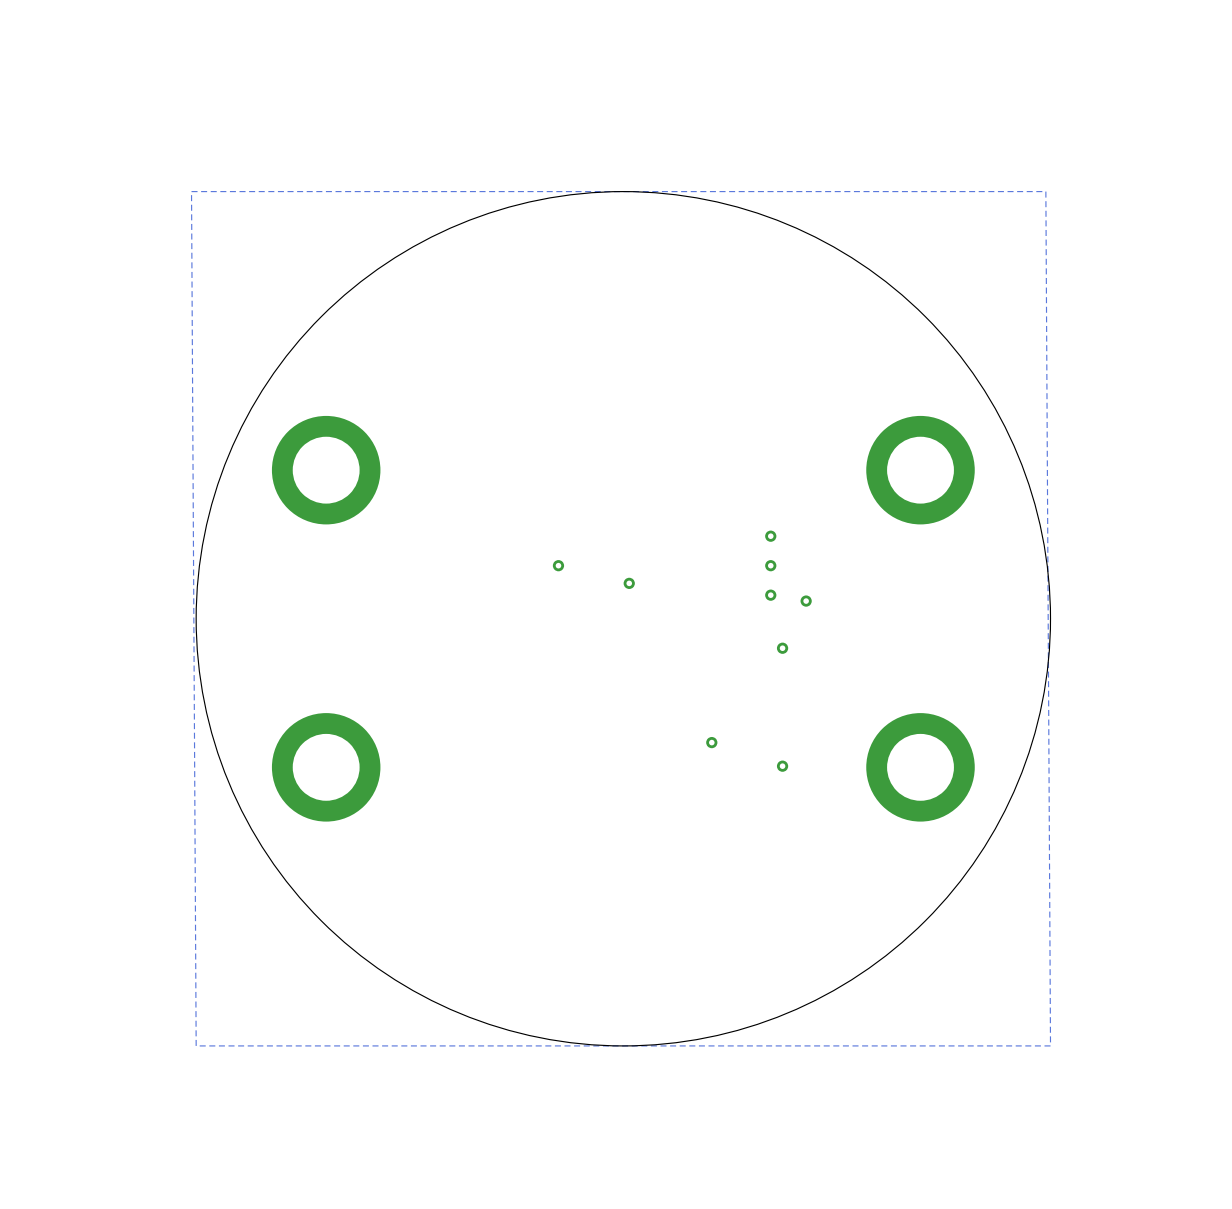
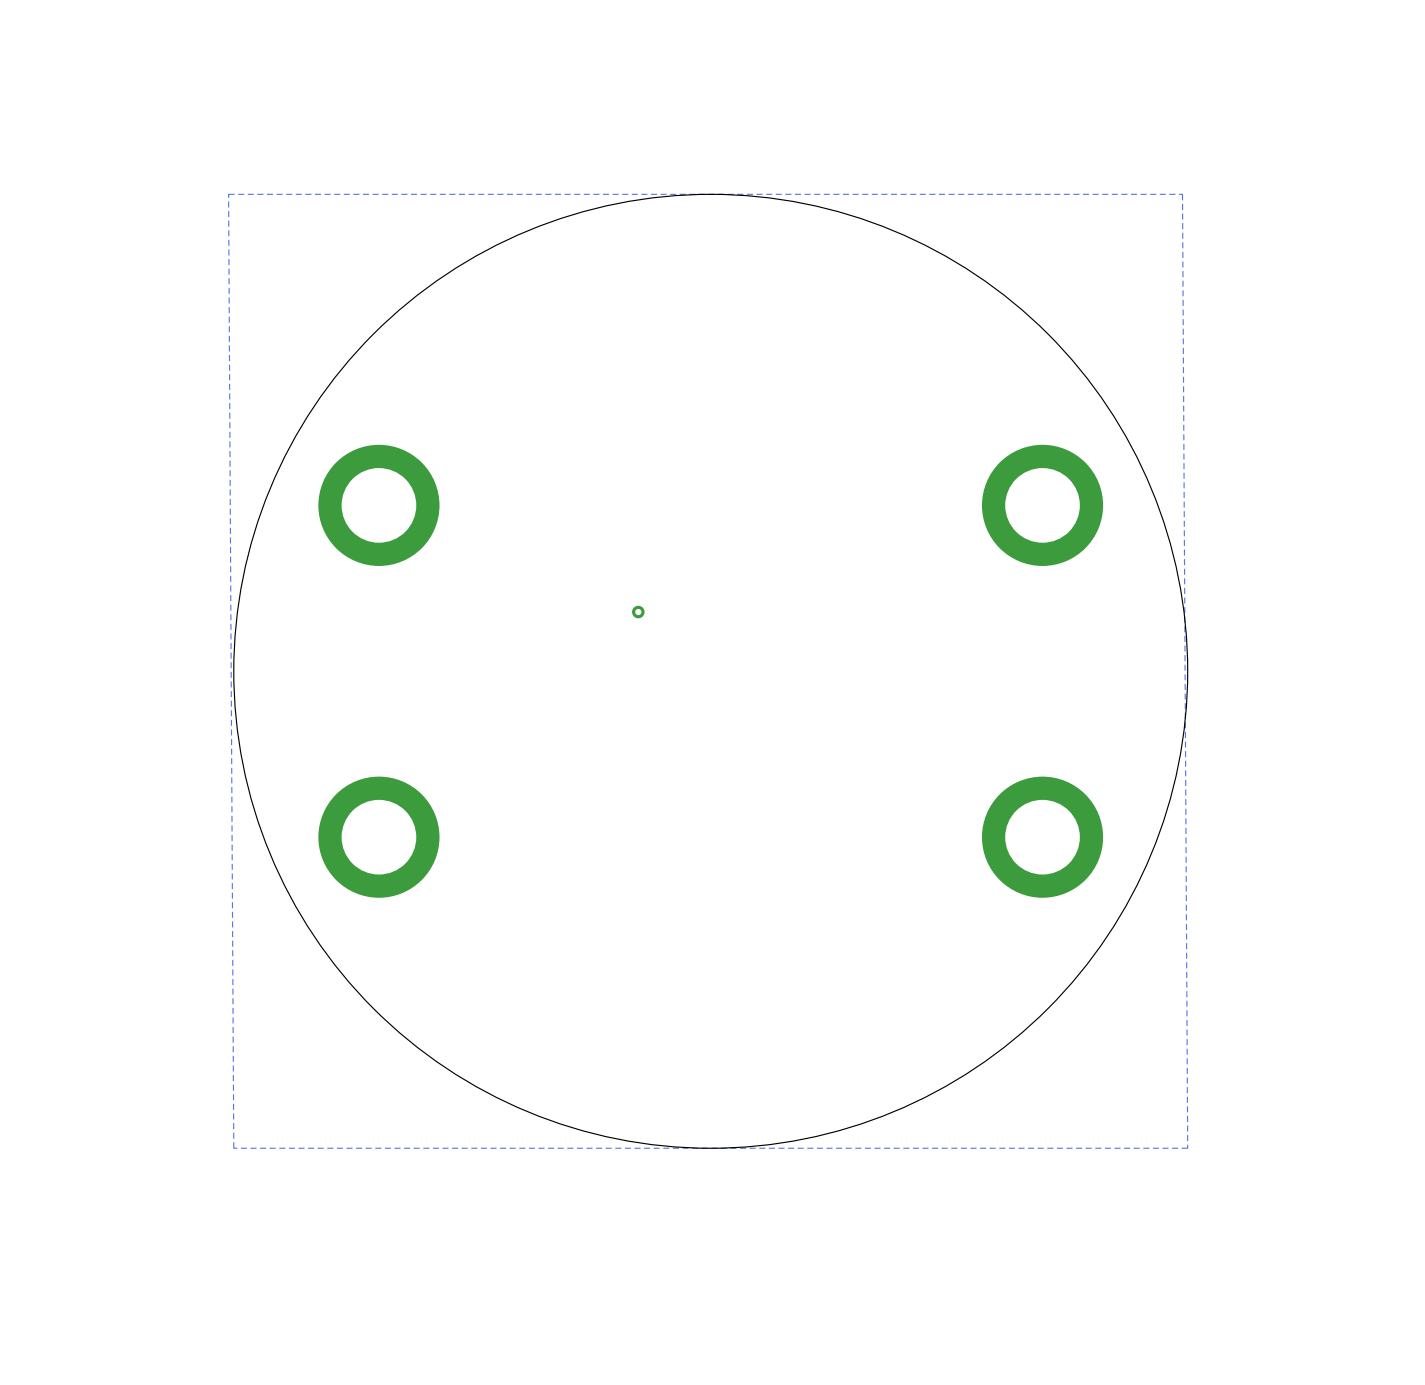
via: (770, 536) -> none
via: (770, 565) -> none
via: (629, 583) -> none
via: (770, 595) -> none
via: (806, 601) -> none
via: (782, 648) -> none
via: (711, 742) -> none
via: (782, 766) -> none

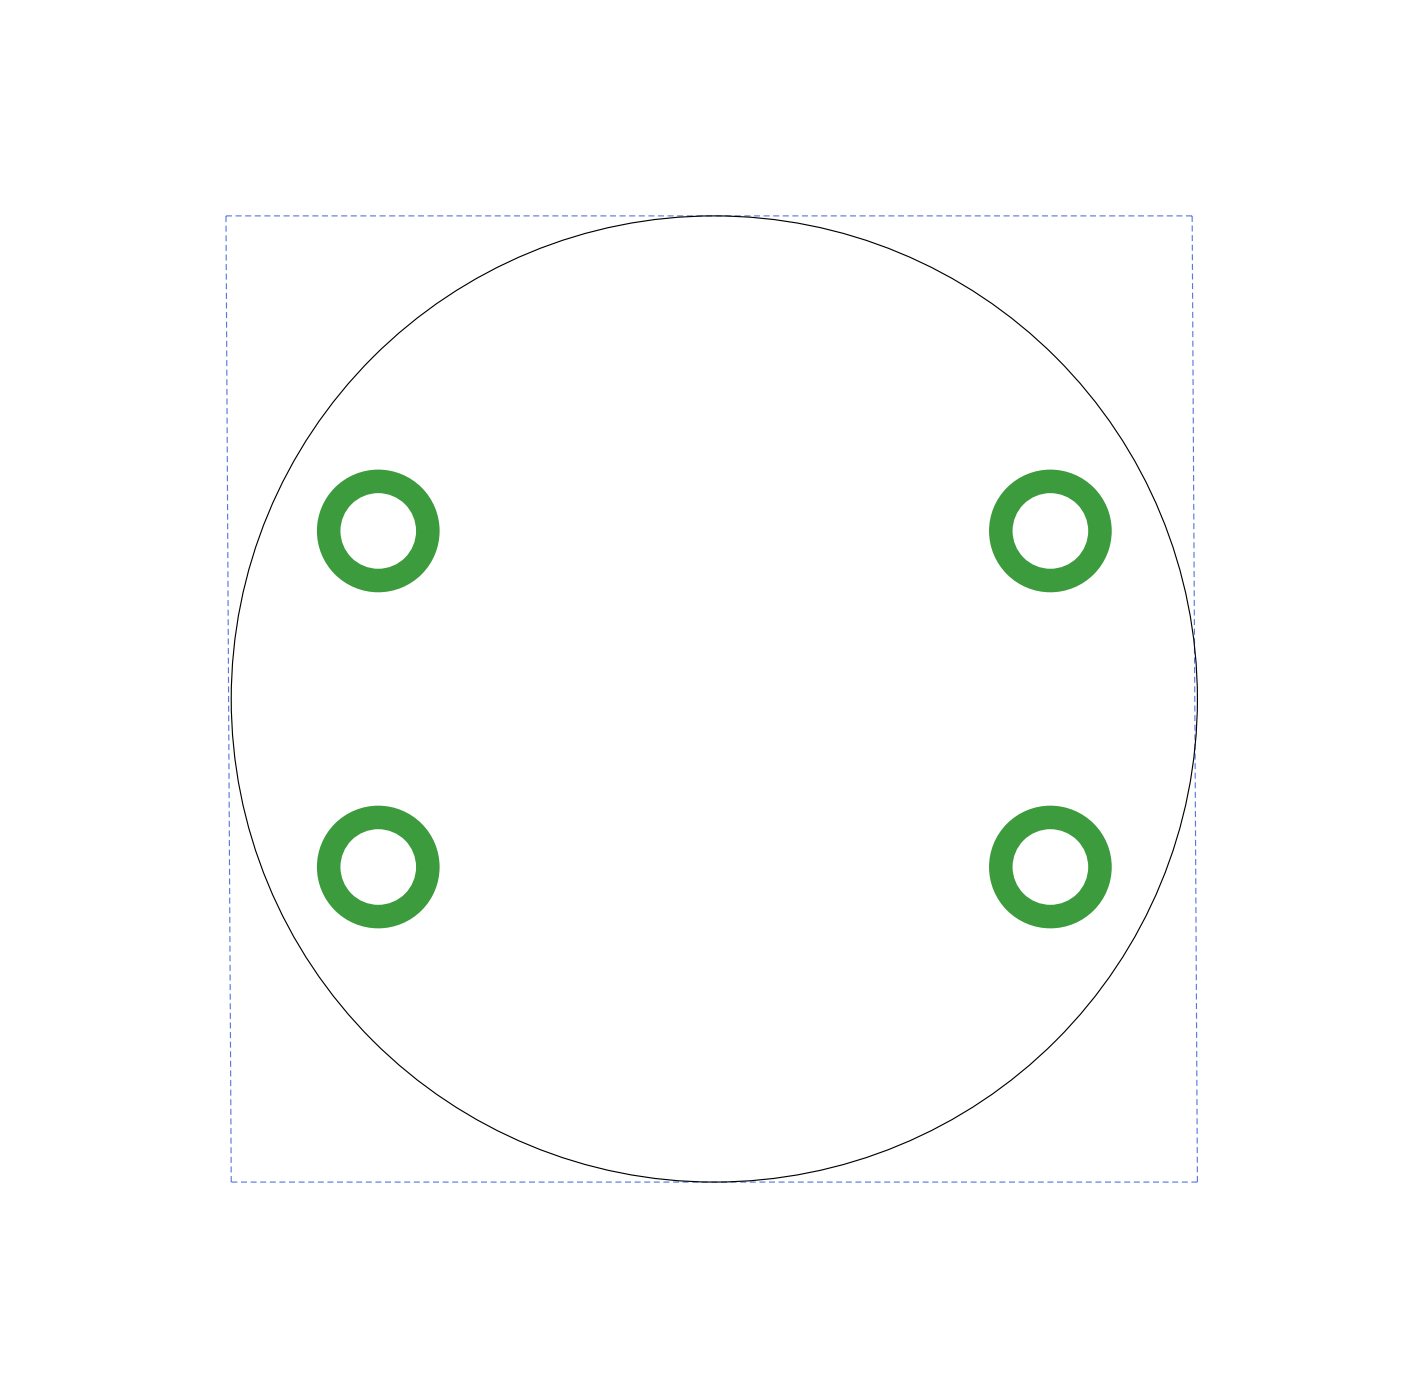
via: (638, 612) -> none

